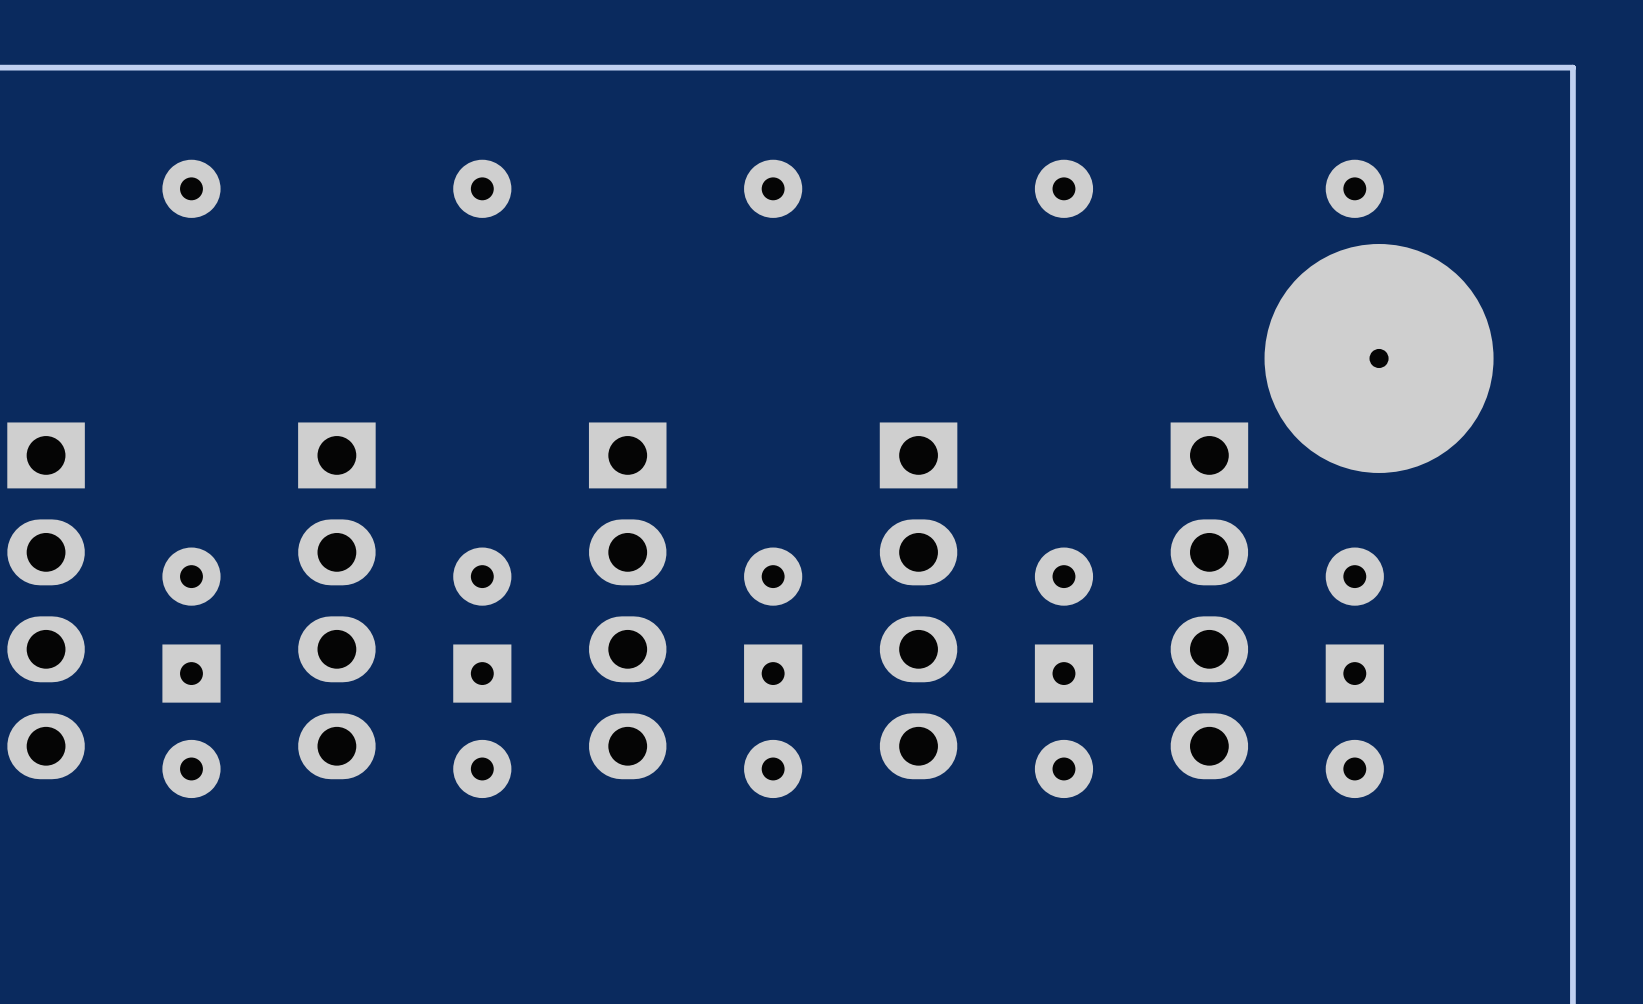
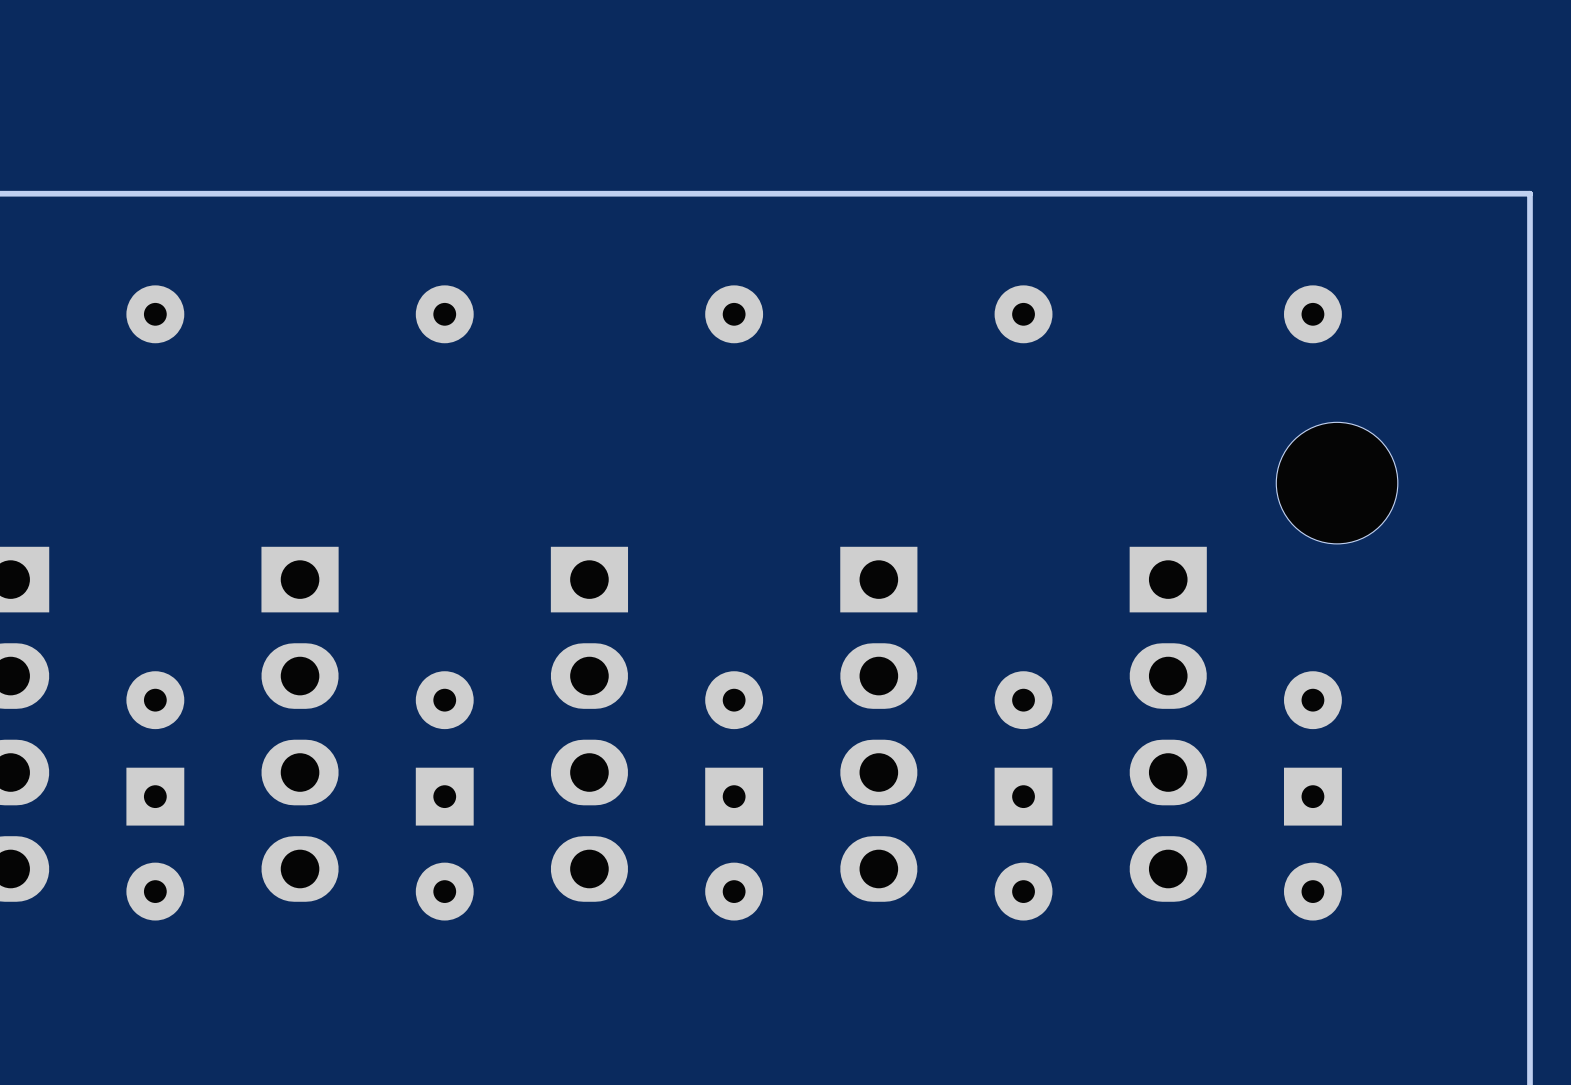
part footprint: [1264, 243, 1494, 473] -> [1276, 422, 1398, 544]

